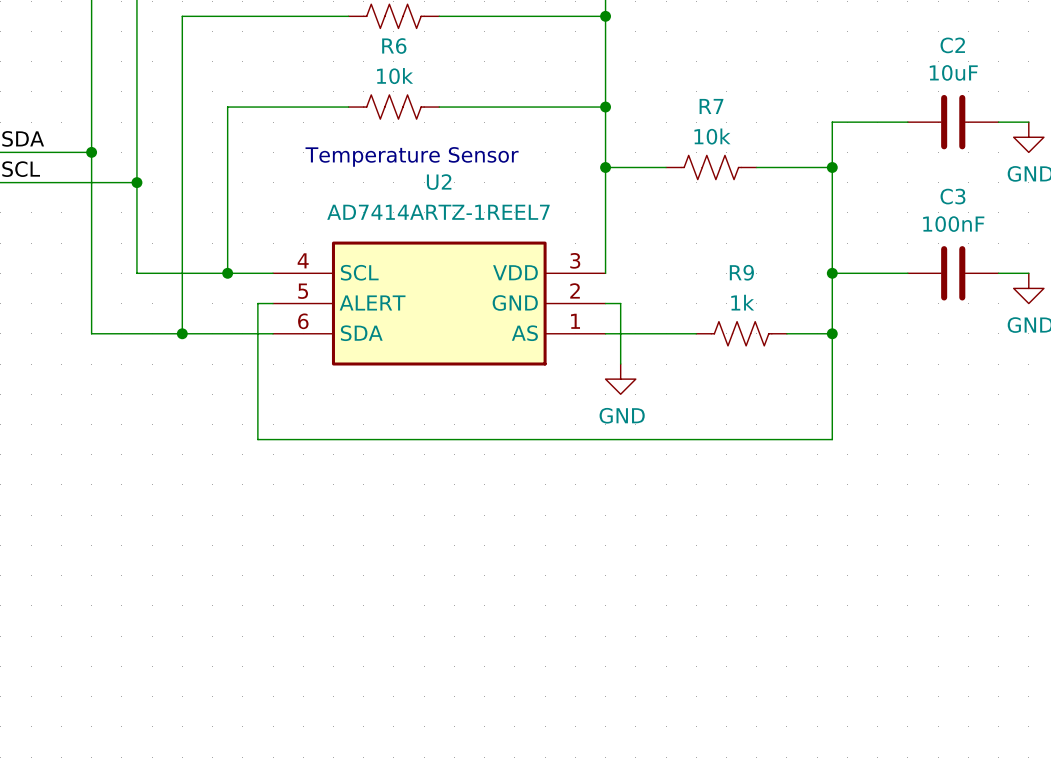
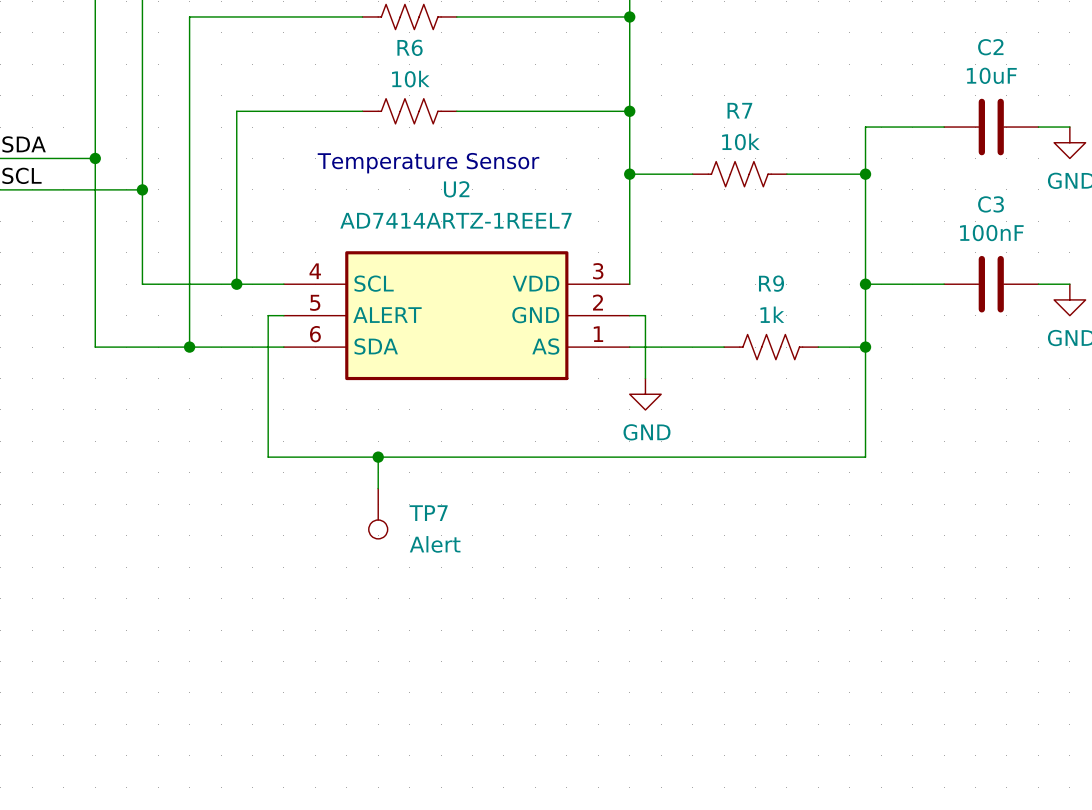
wire: none -> (378, 457) (378, 488)
junction: none -> (378, 457)
TP7: none -> Alert (378, 513)

